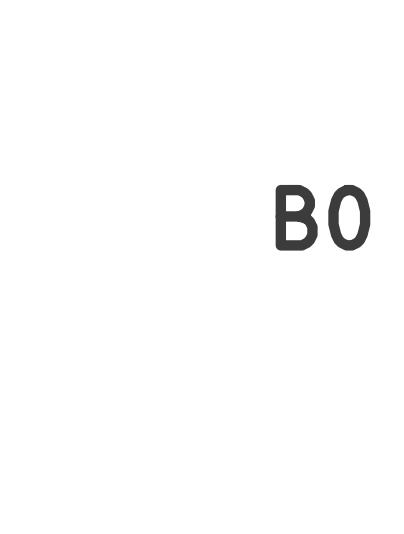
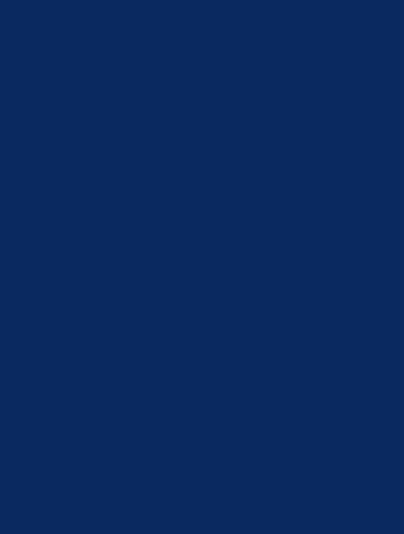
text: B0 (322, 217) -> none

